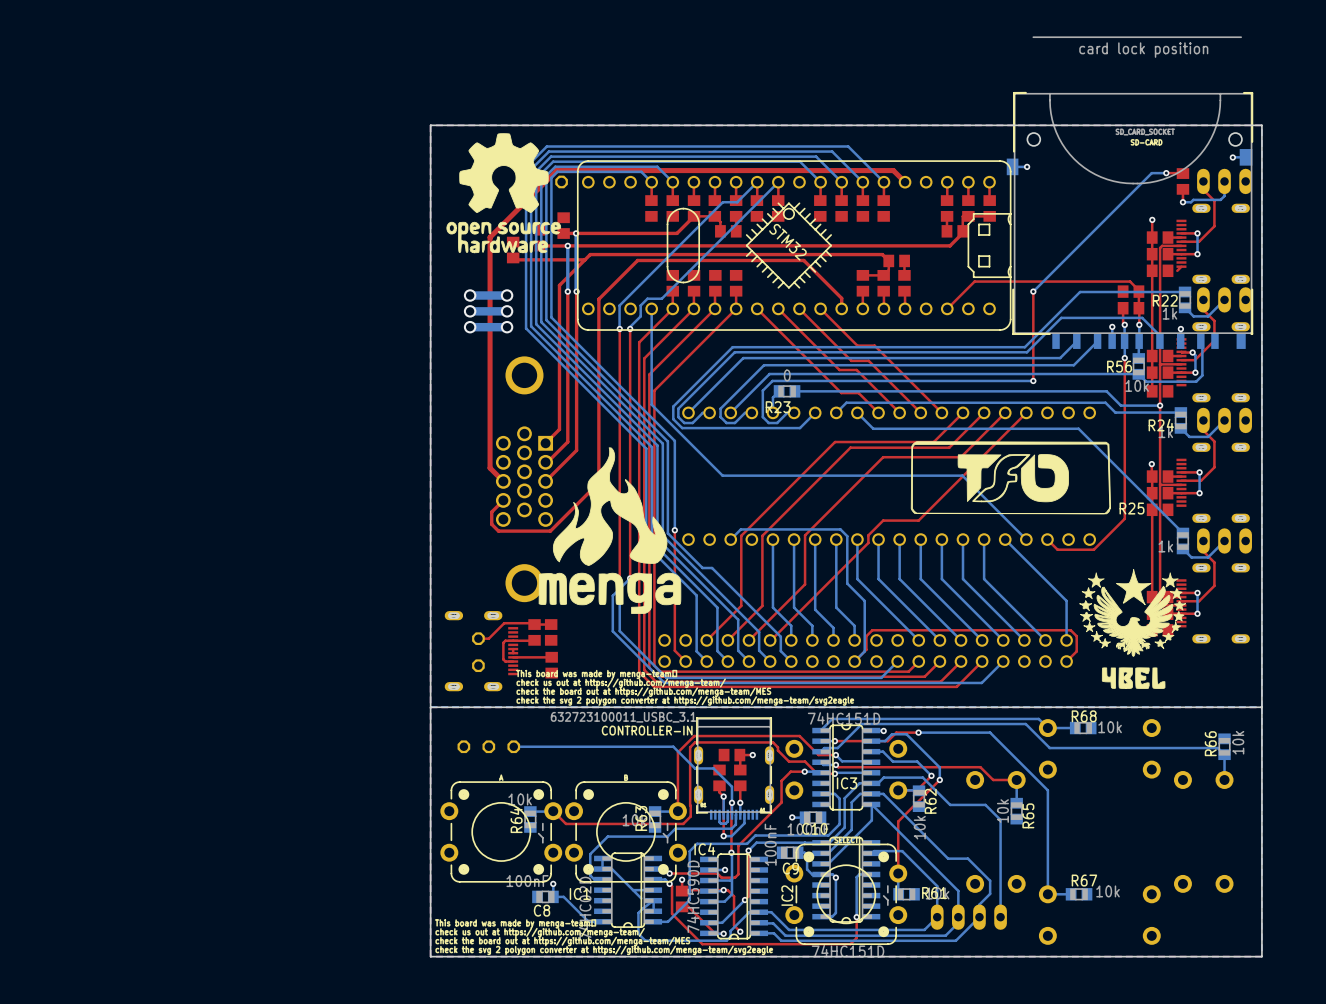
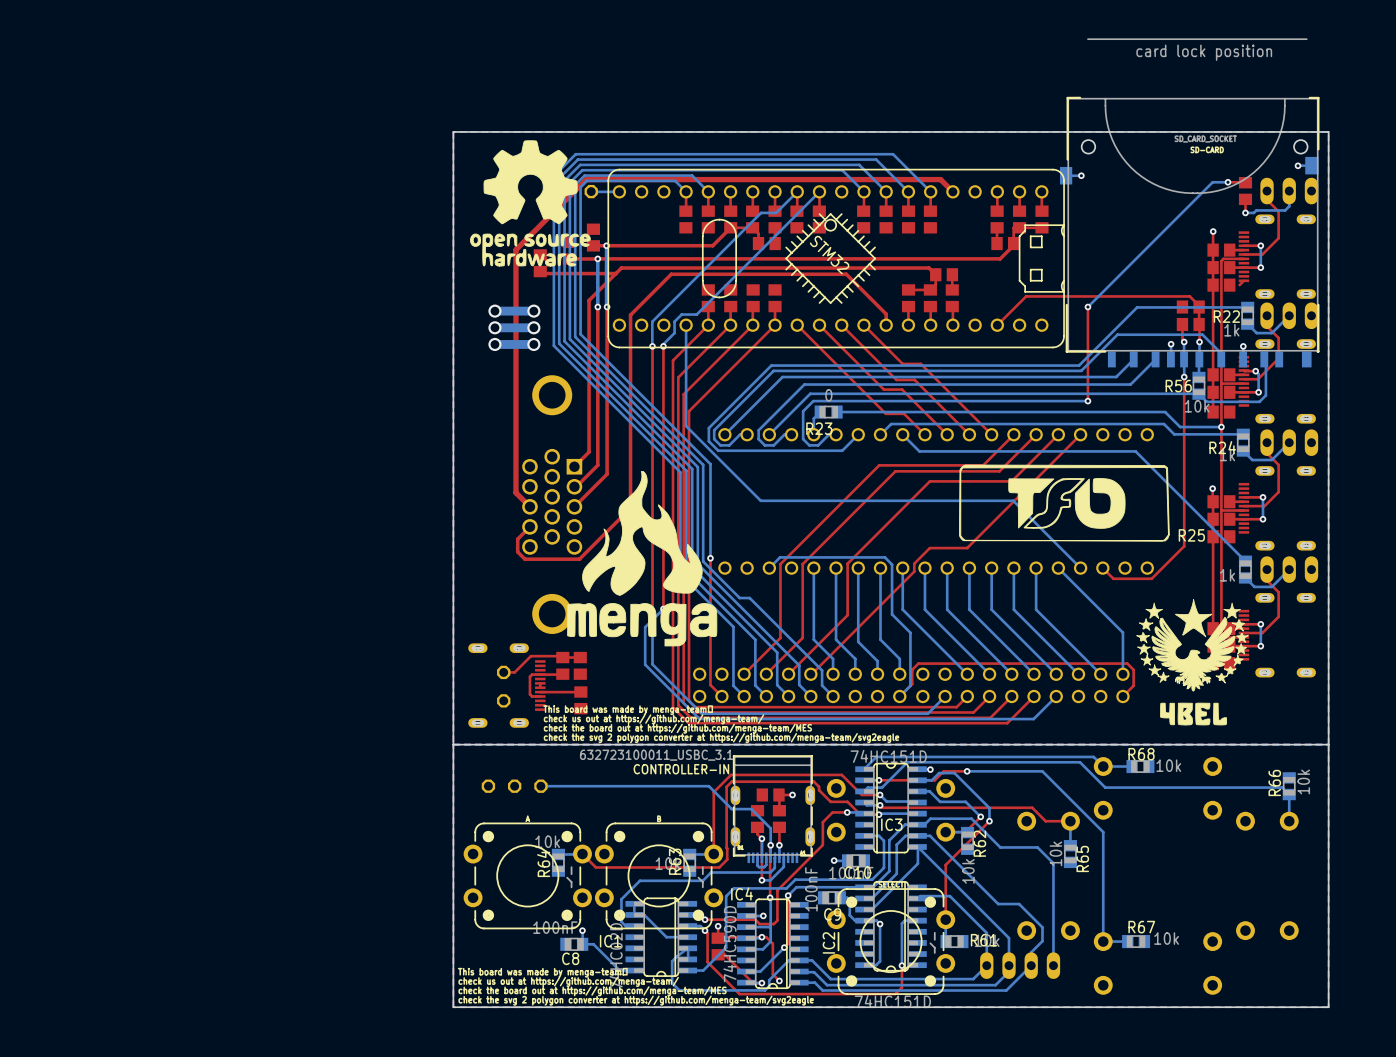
bottom track: none -> (619, 191) (591, 191)
bottom track: (633, 890) (641, 898) -> none

